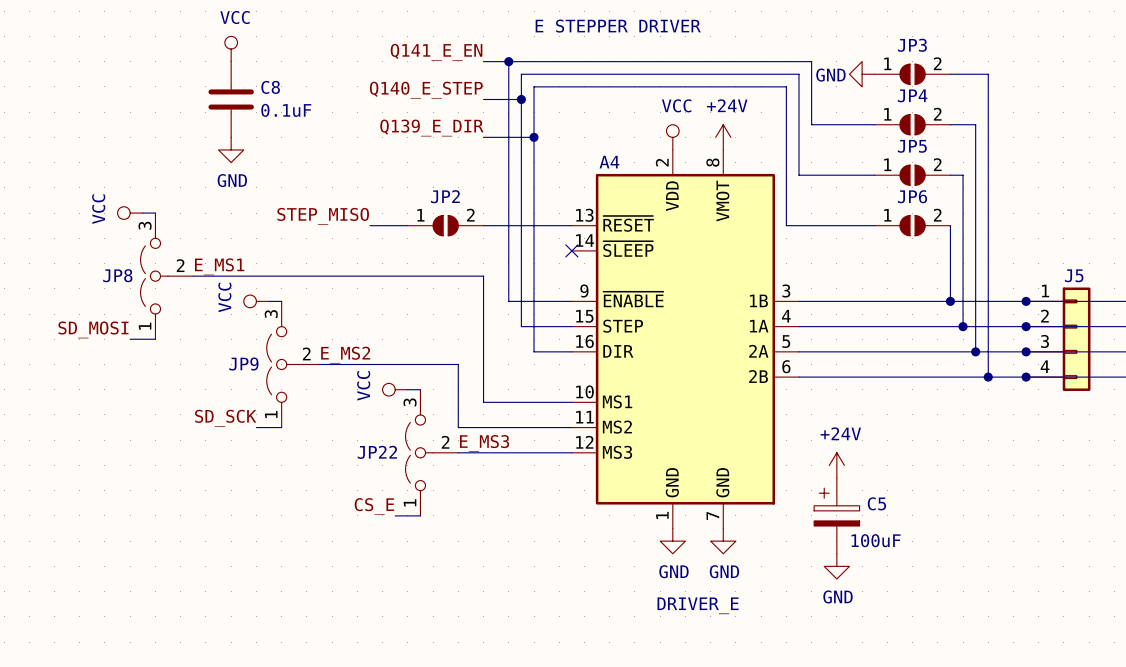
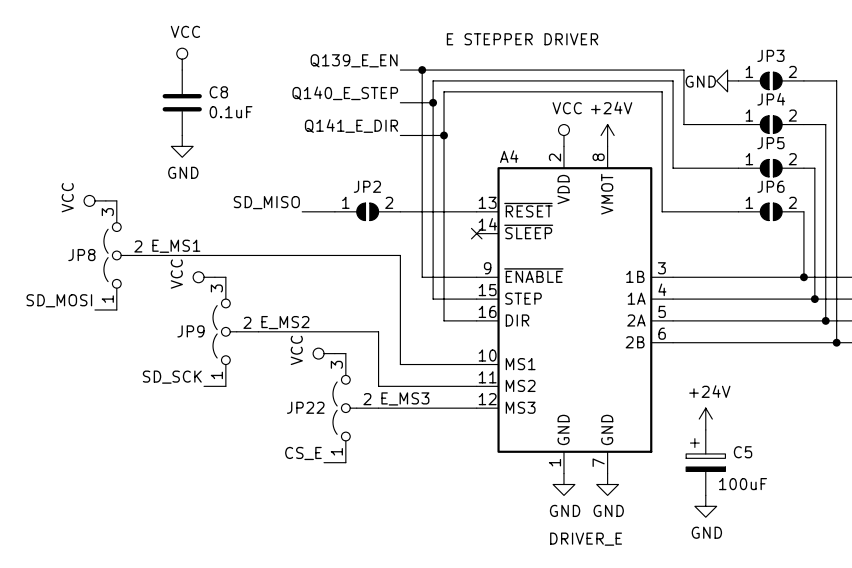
label: Q141_E_EN (436, 52) -> Q139_E_EN (354, 60)
label: Q139_E_DIR (431, 128) -> Q141_E_DIR (351, 126)
label: STEP_MISO (323, 216) -> SD_MISO (266, 202)

